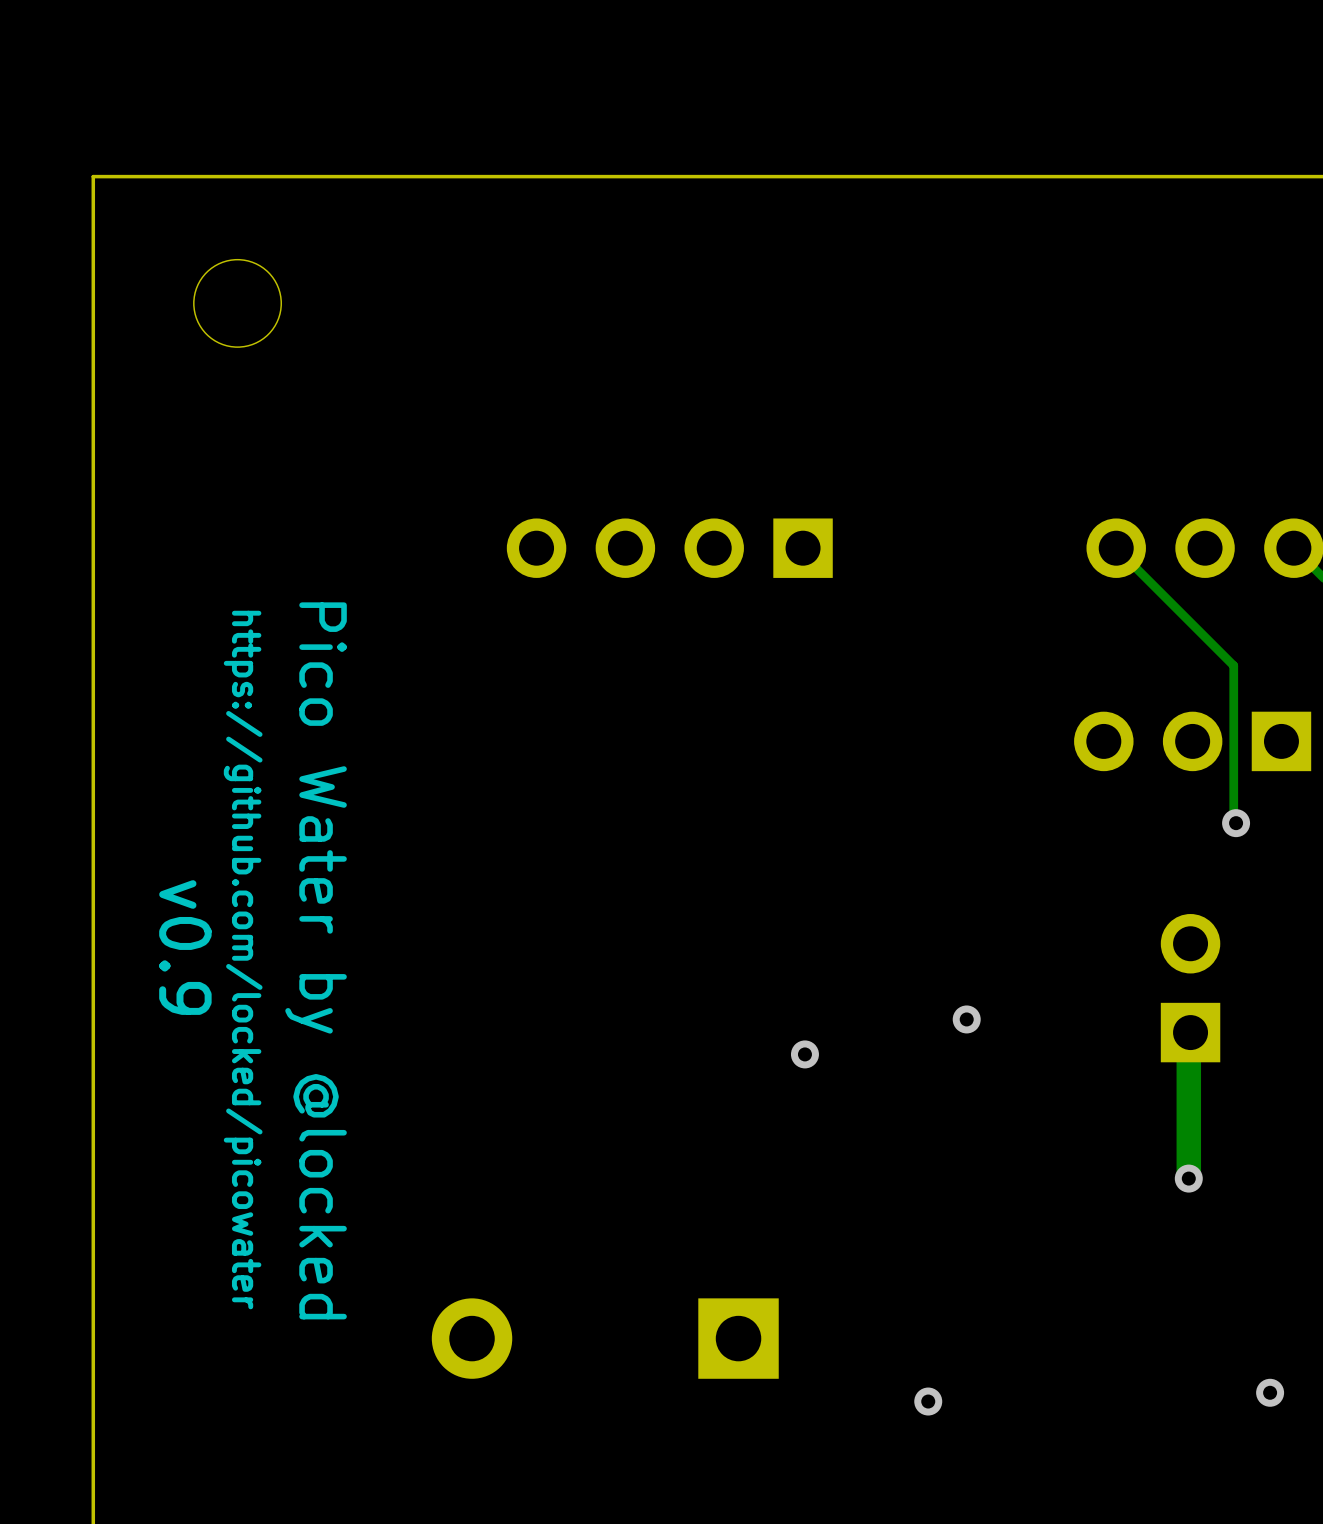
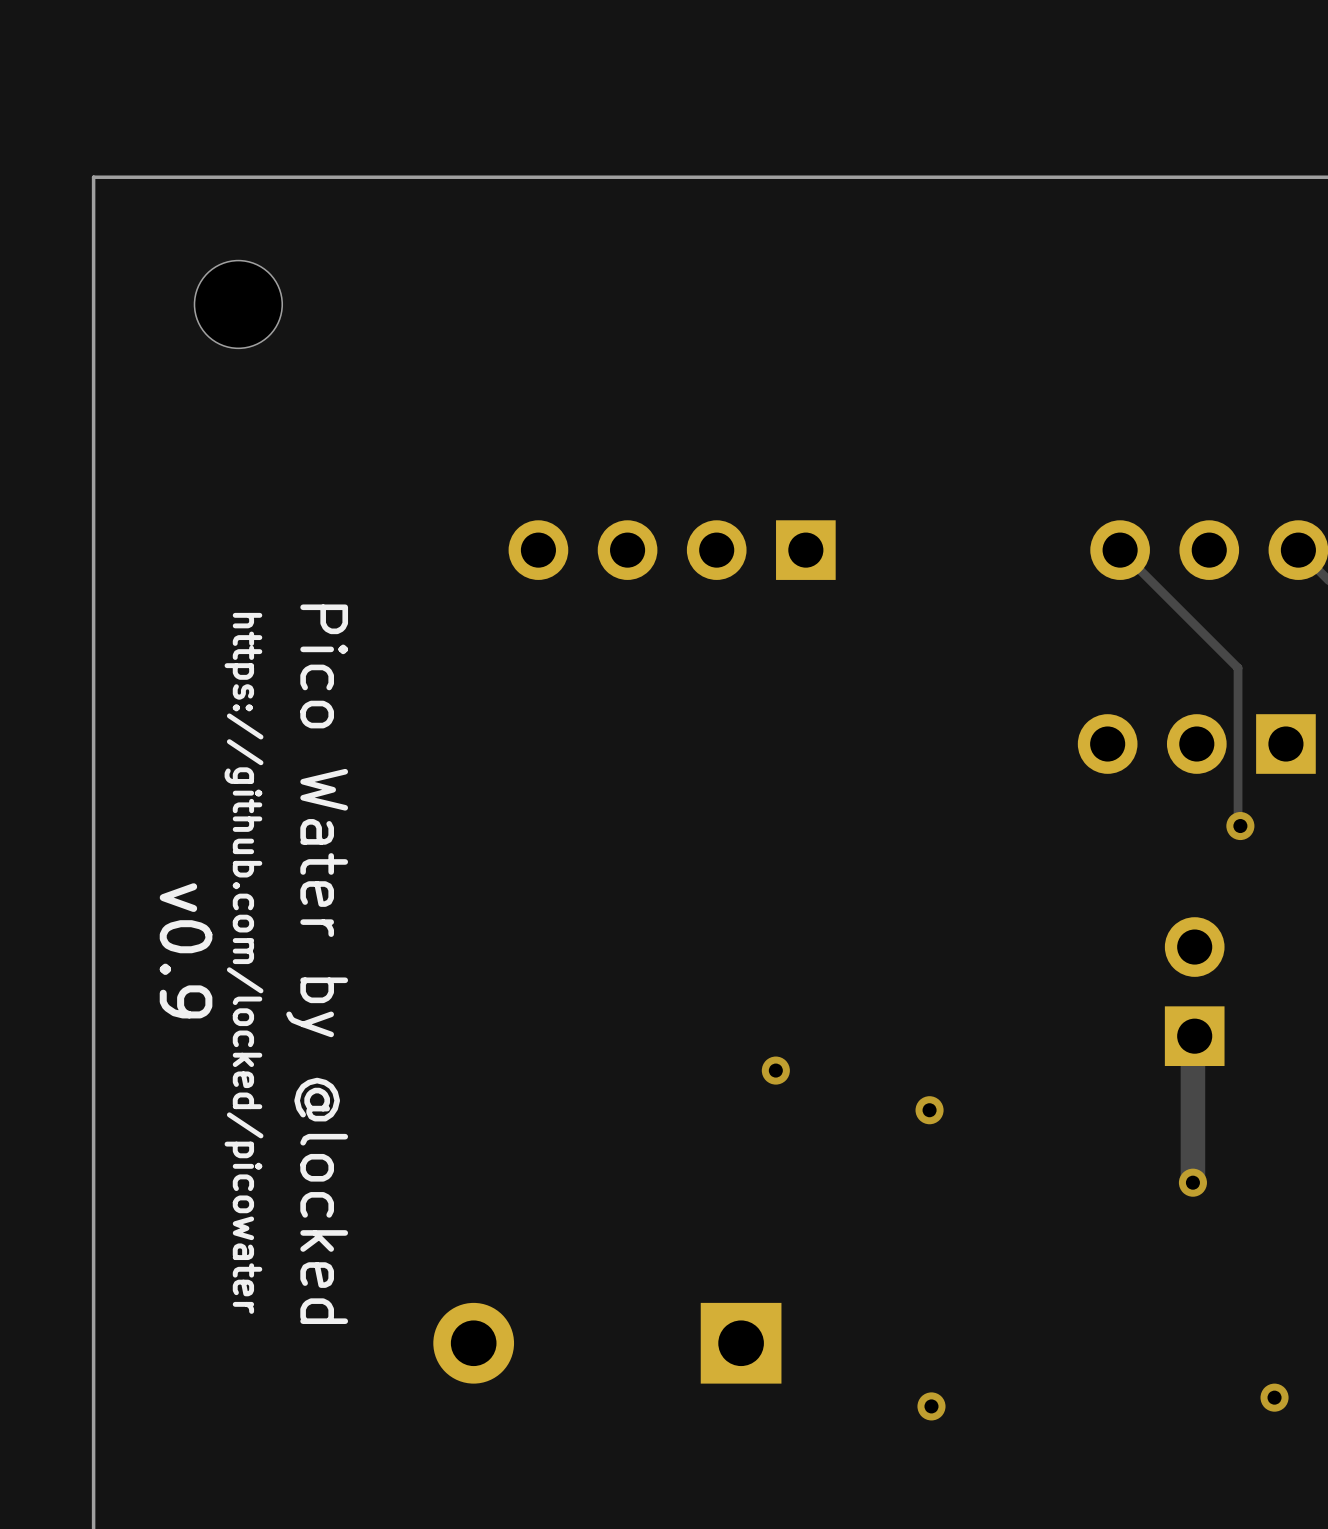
via: (966, 1019) -> none
via position: (804, 1054) -> (775, 1070)
via: none -> (929, 1110)

